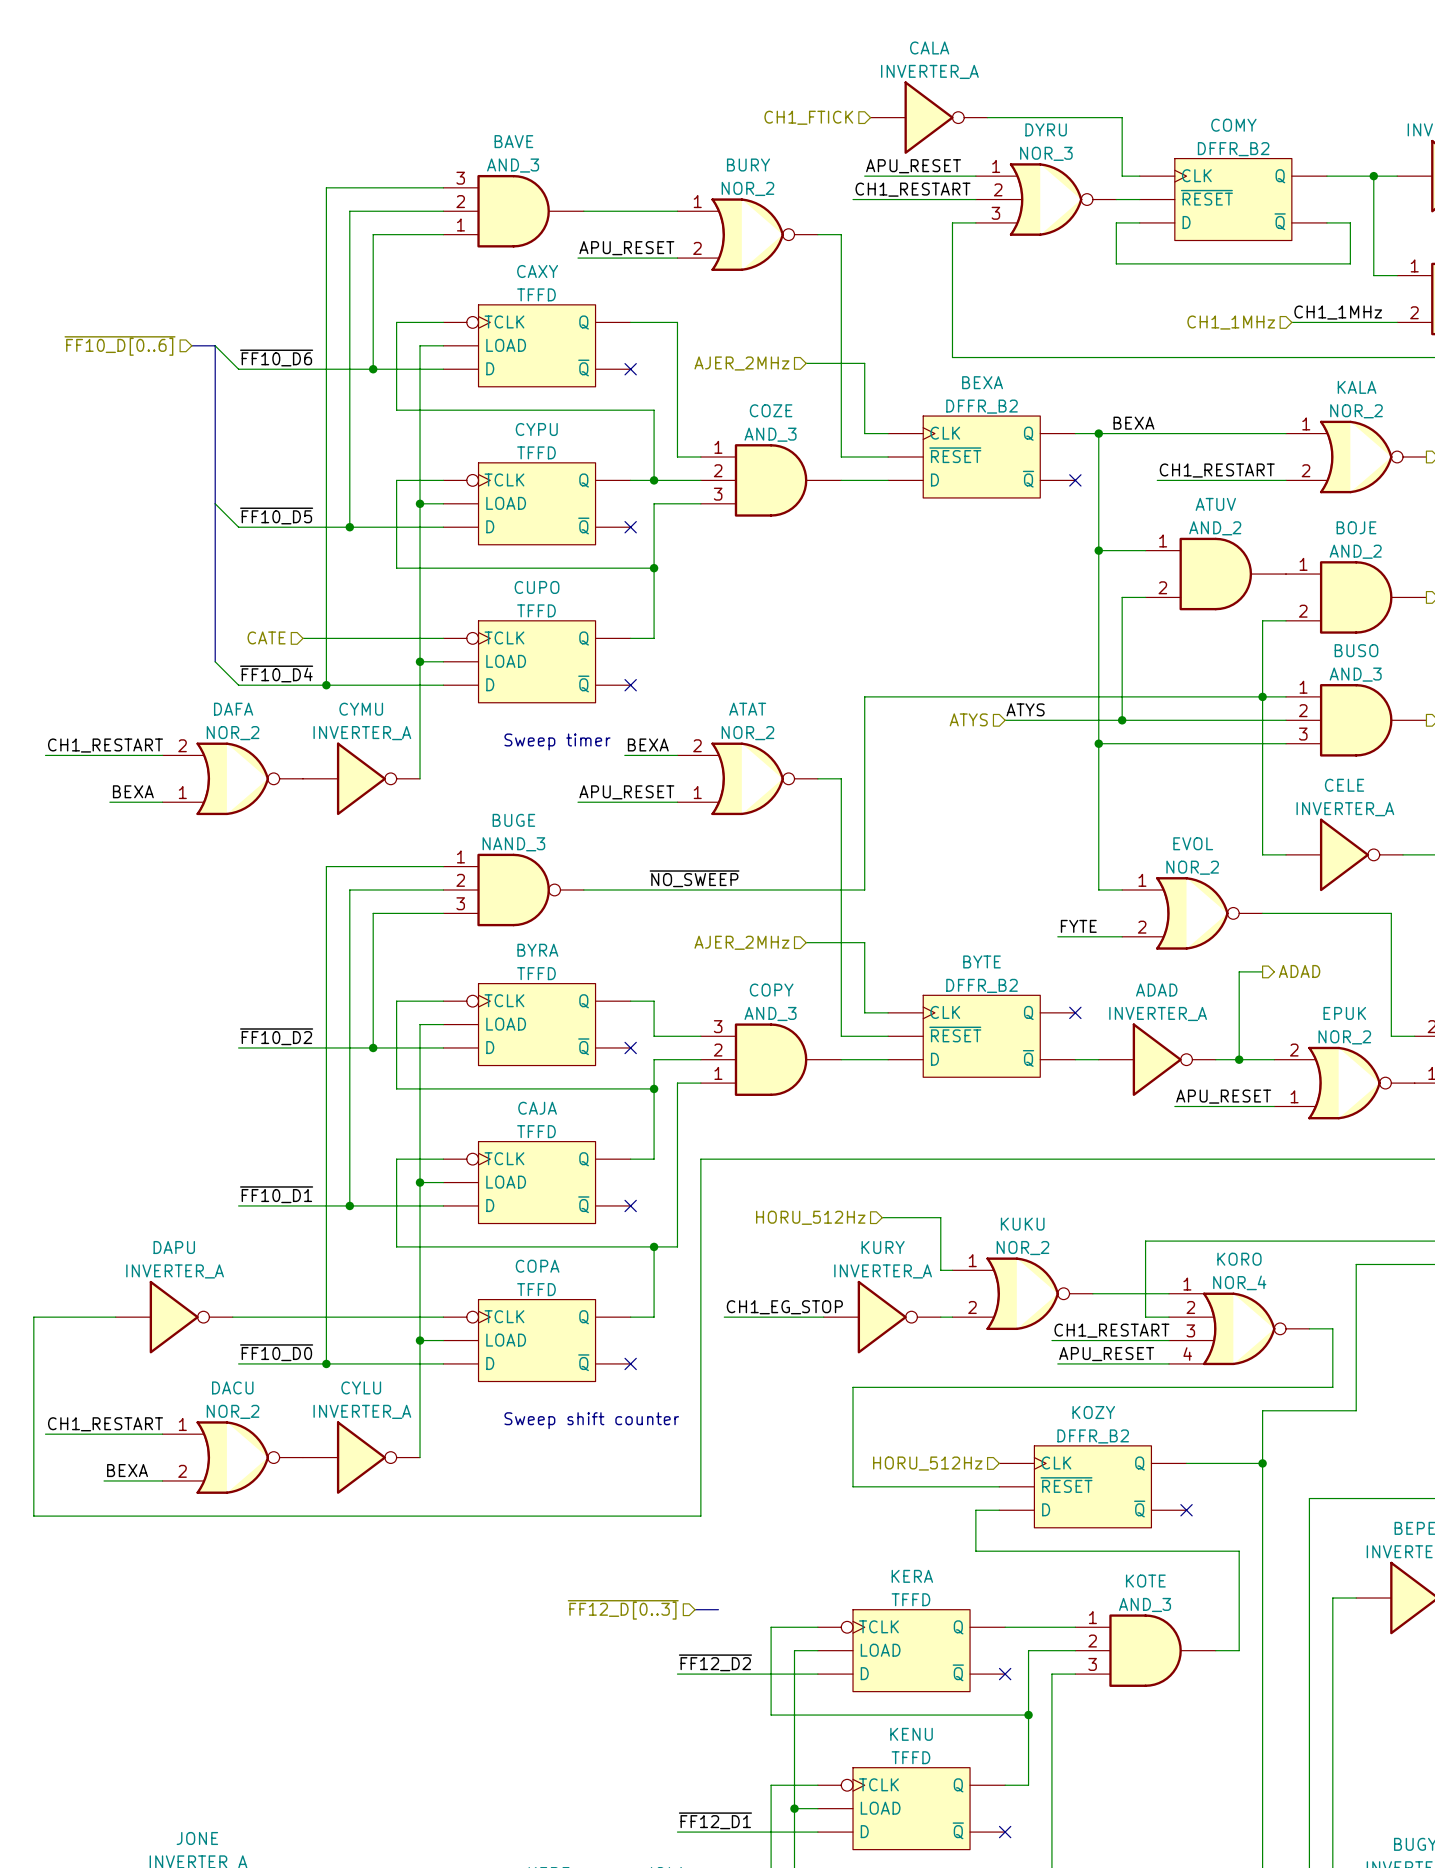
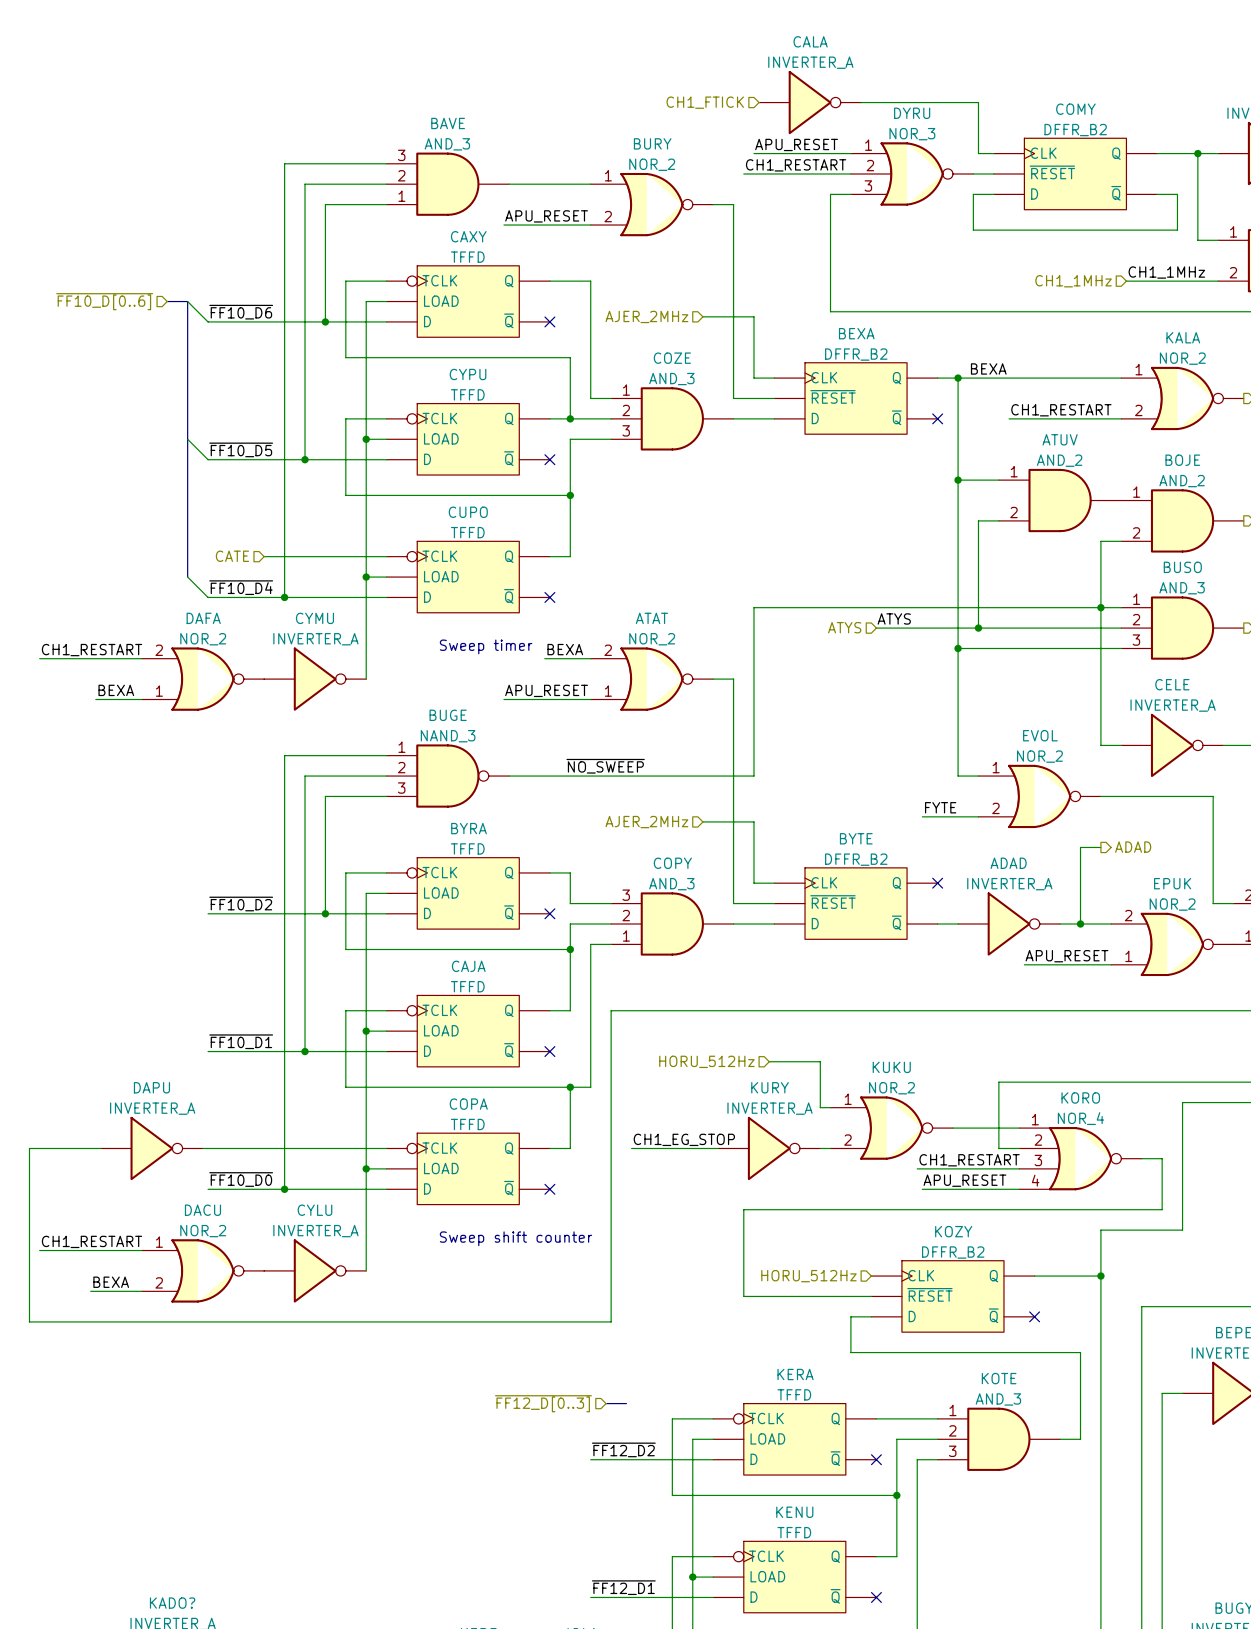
JONE name: JONE (197, 1838) -> KADO? (172, 1603)

